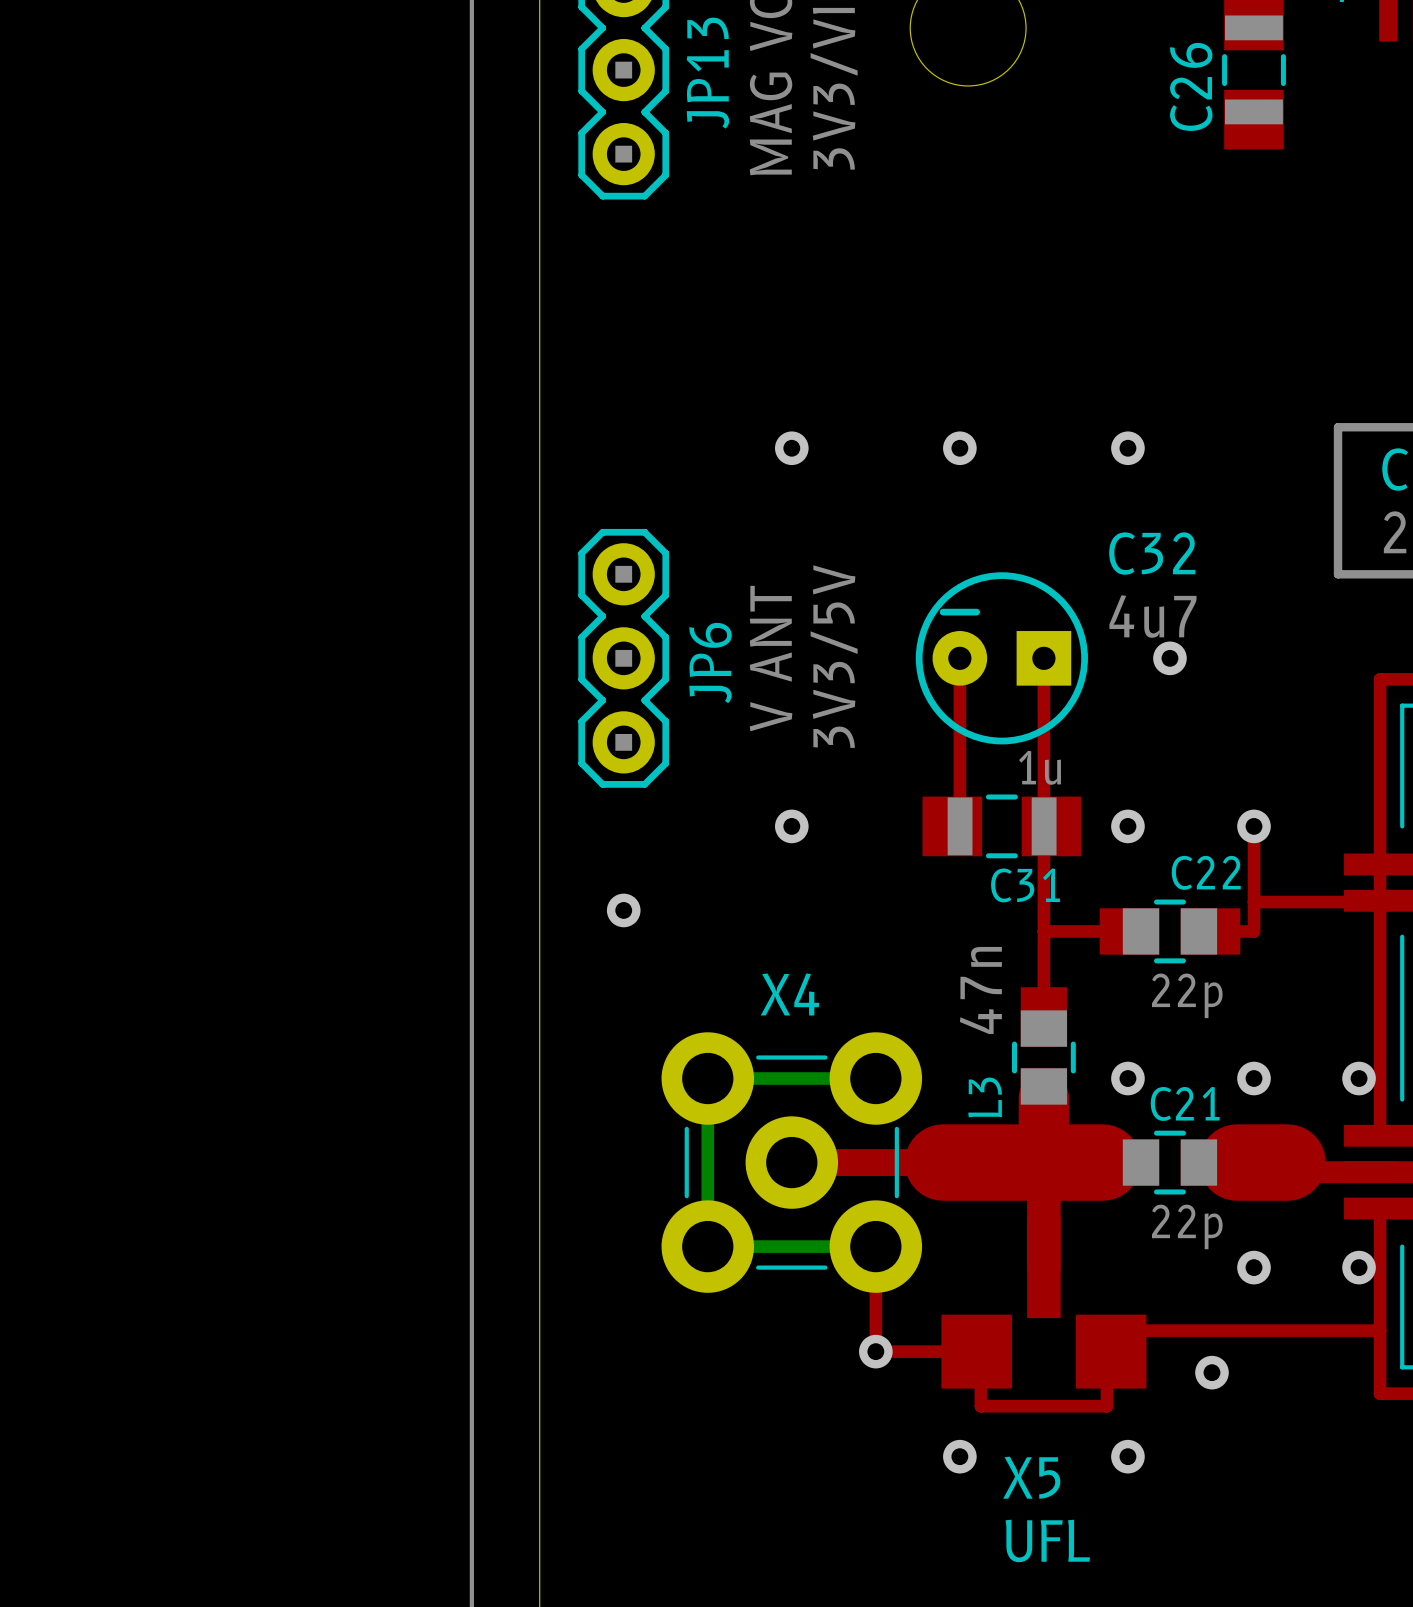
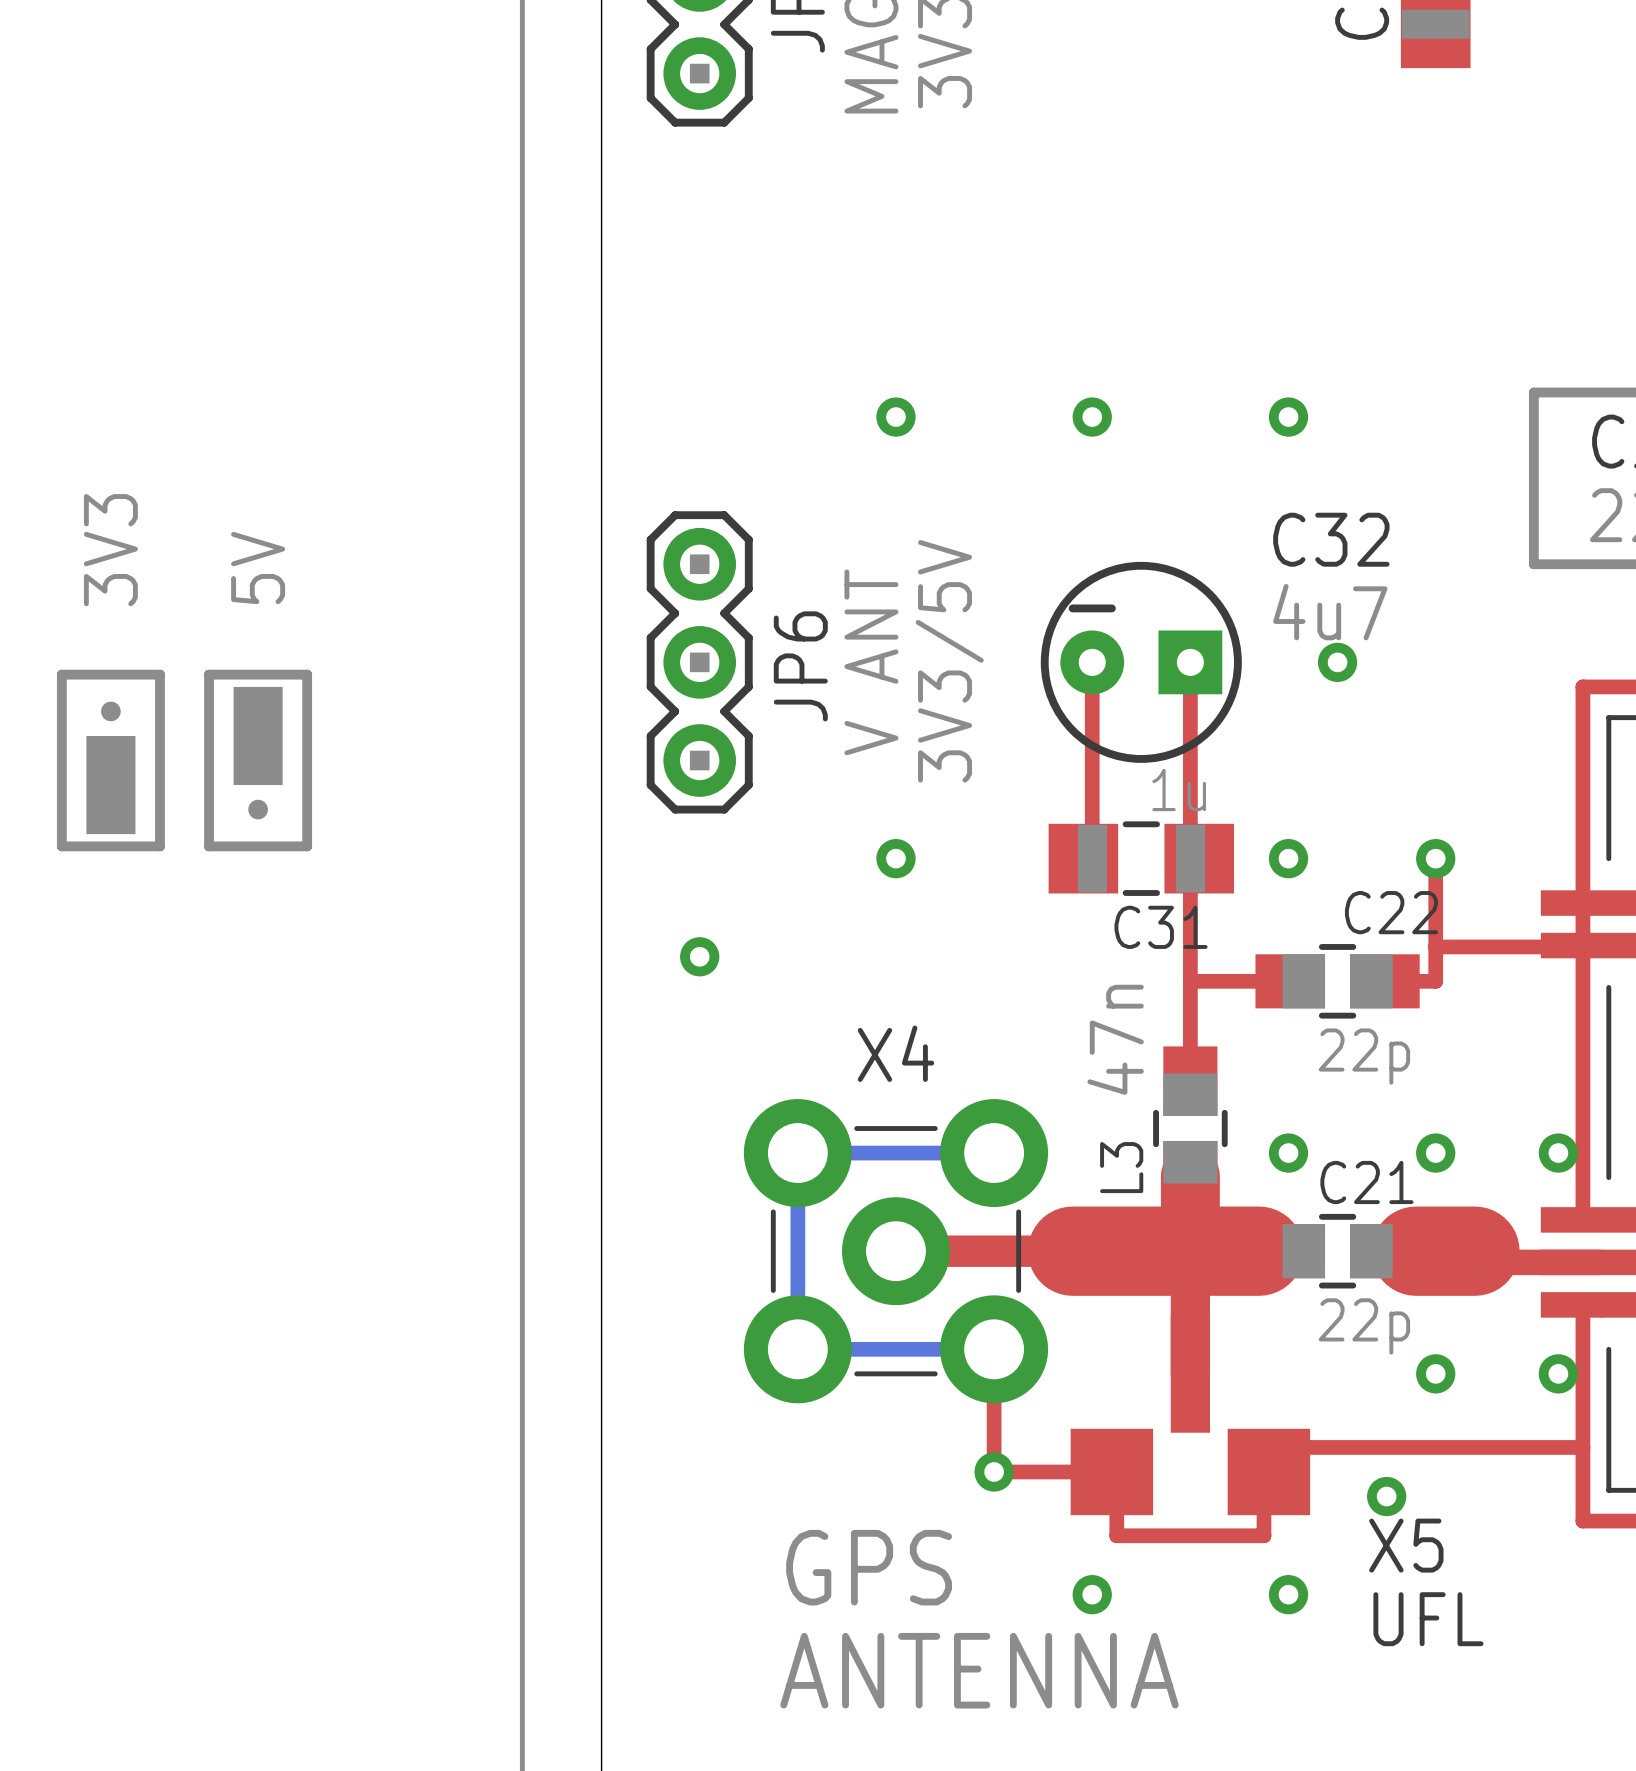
text: none -> 3V3 (110, 550)
text: none -> 5V (258, 568)
line: none -> (61, 674) (159, 674) (159, 846) (61, 846) (61, 674)
line: none -> (209, 674) (209, 846) (307, 846) (307, 674) (209, 674)
drawing: none -> [233, 686, 283, 820]
drawing: none -> [86, 701, 136, 835]
text: none -> GPS (869, 1567)
X5 name position: X5 (1031, 1477) -> X5 (1406, 1545)
text: none -> ANTENNA (979, 1670)
X5 value position: UFL (1047, 1540) -> UFL (1428, 1619)

